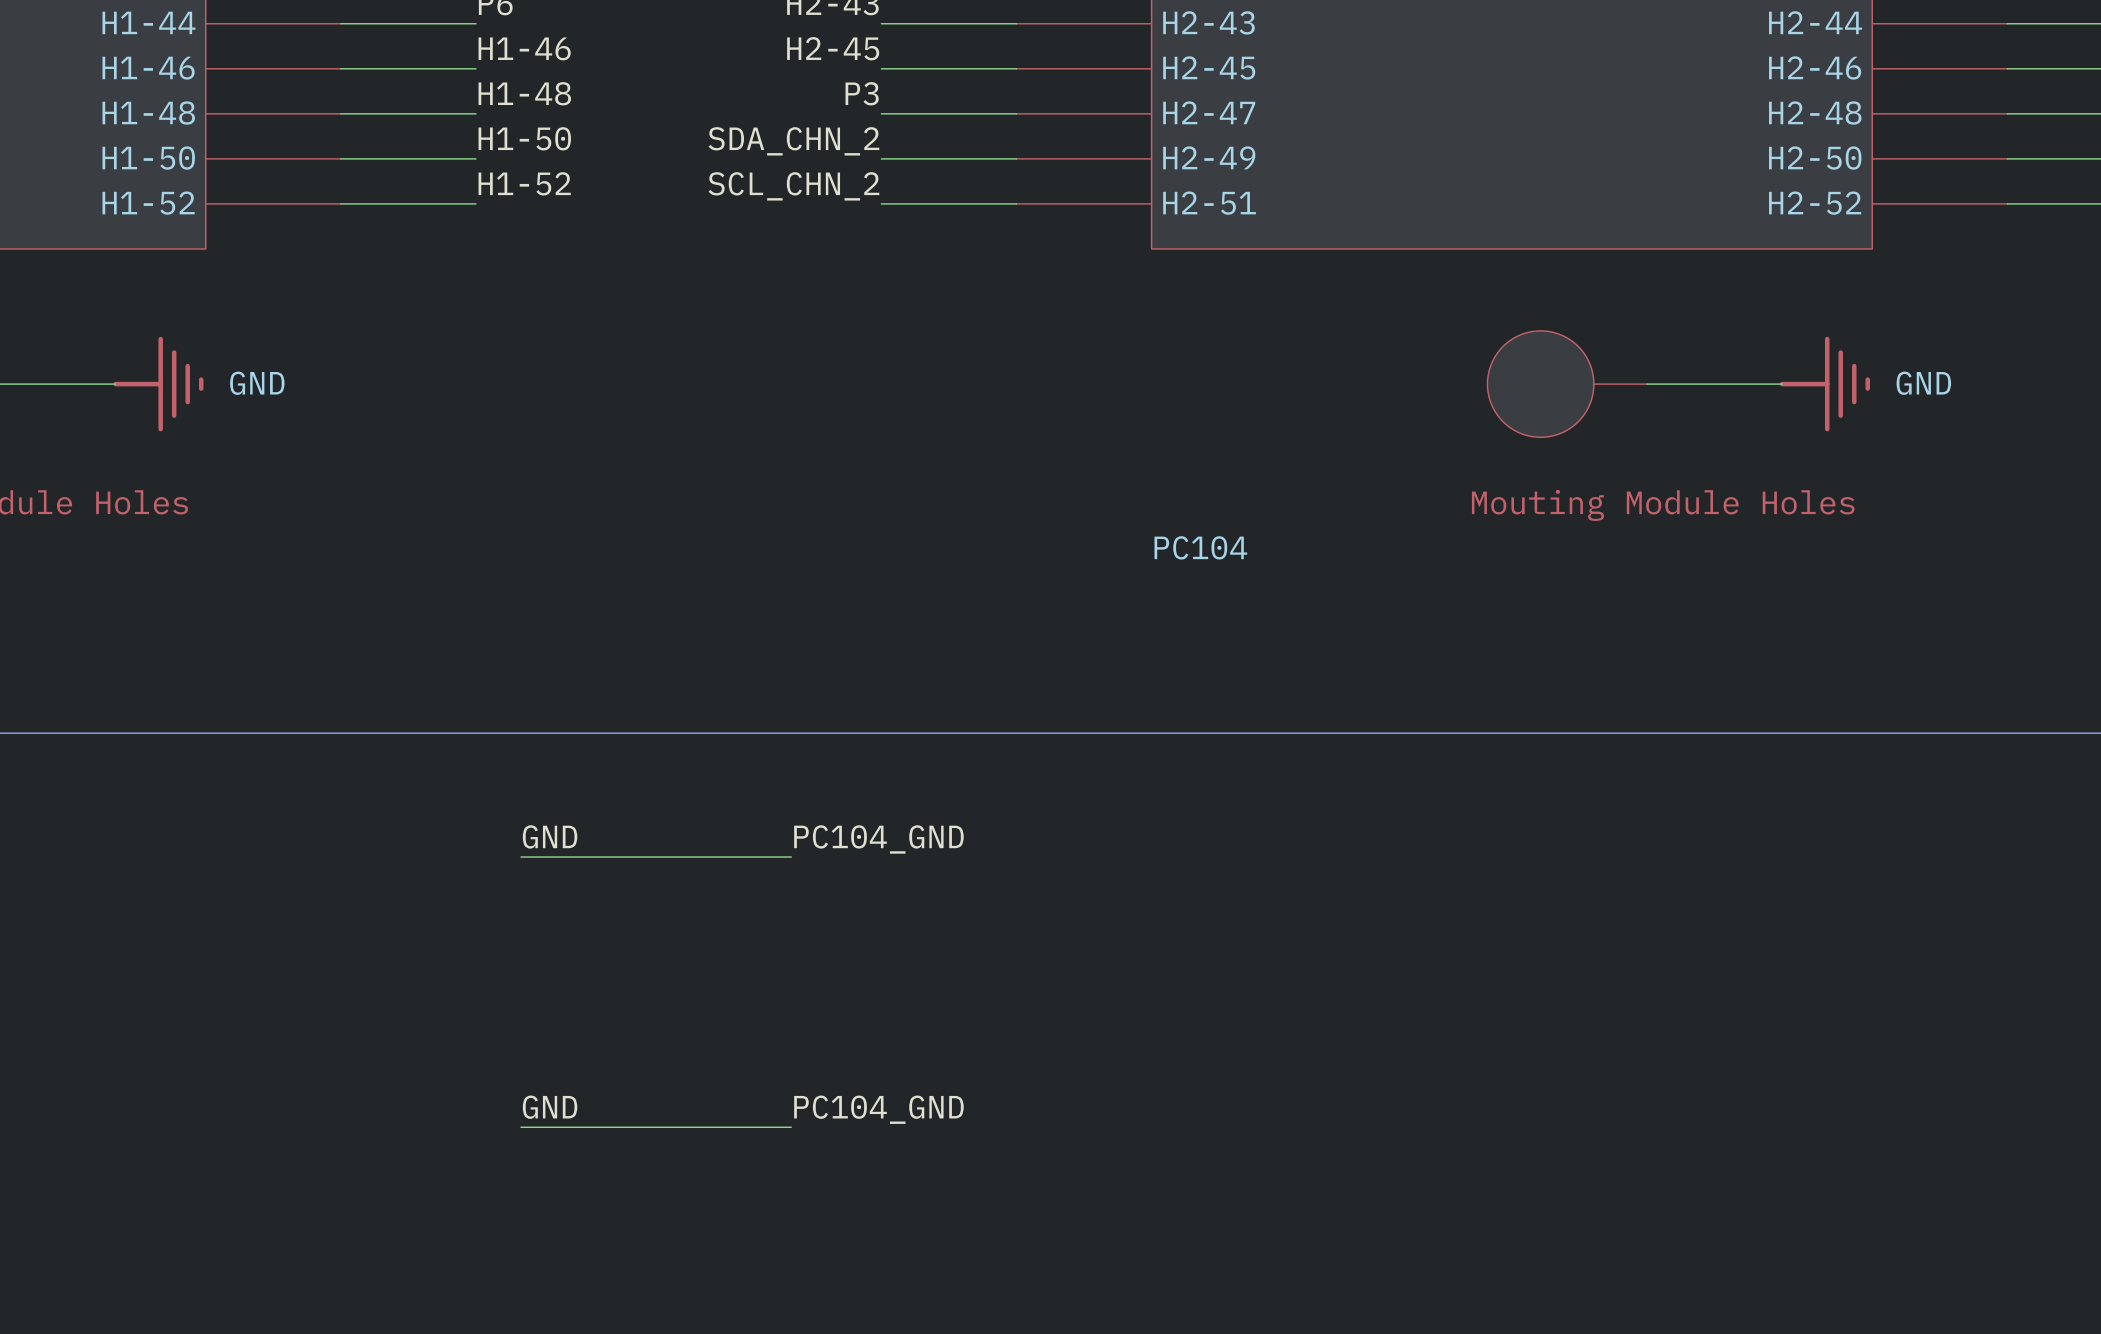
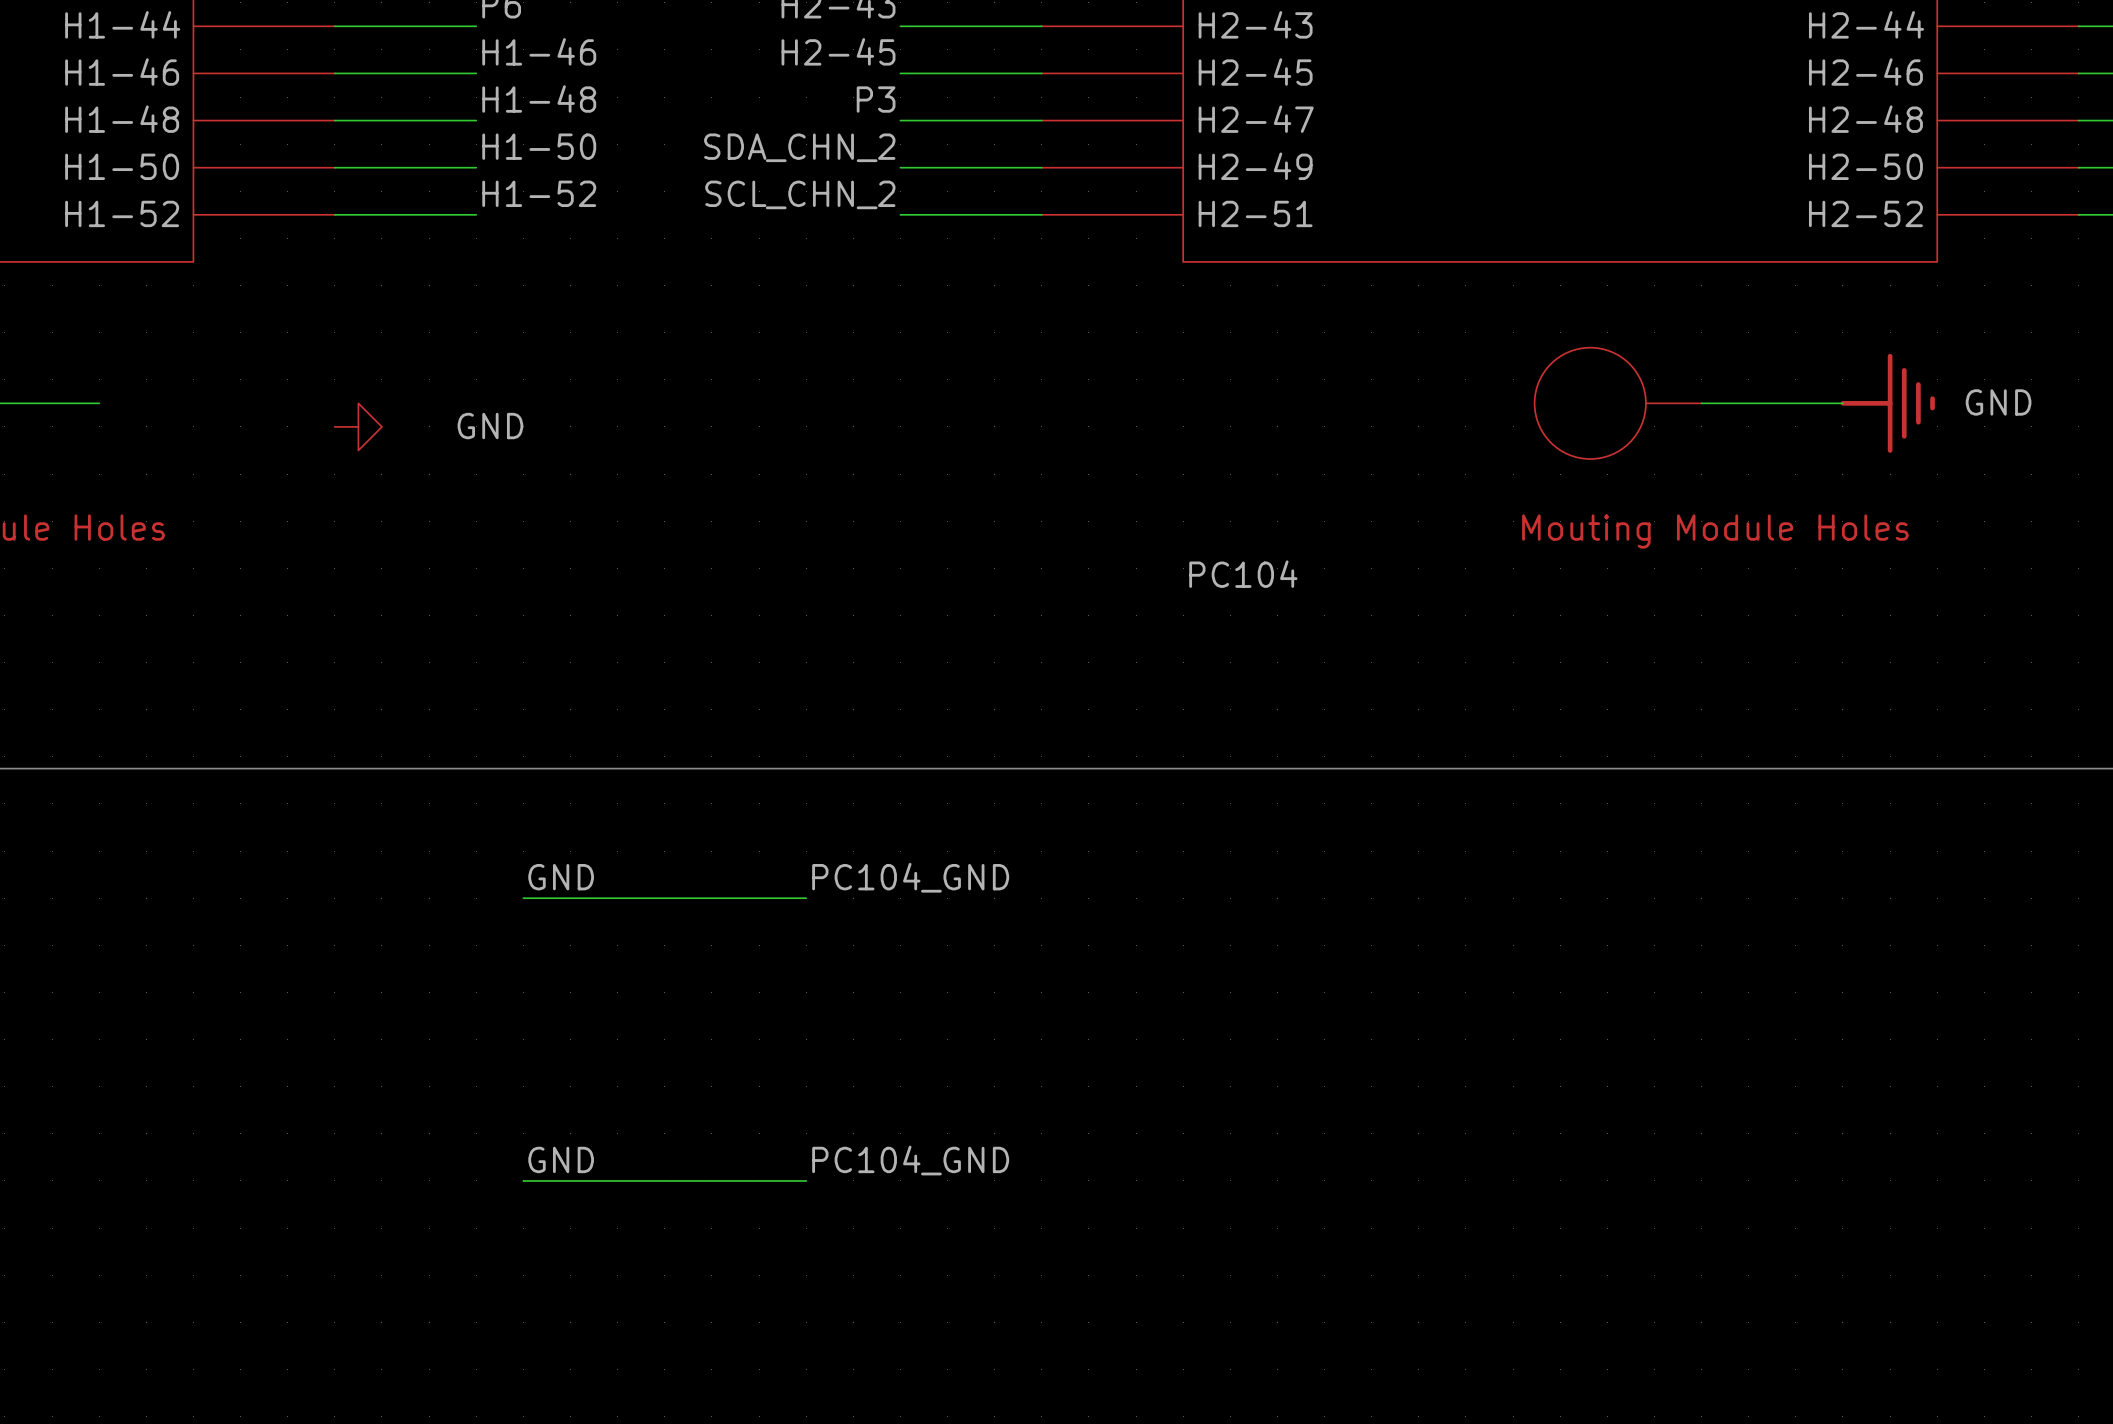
power symbol: GND (158, 384) -> none
power symbol: none -> GND (358, 426)

